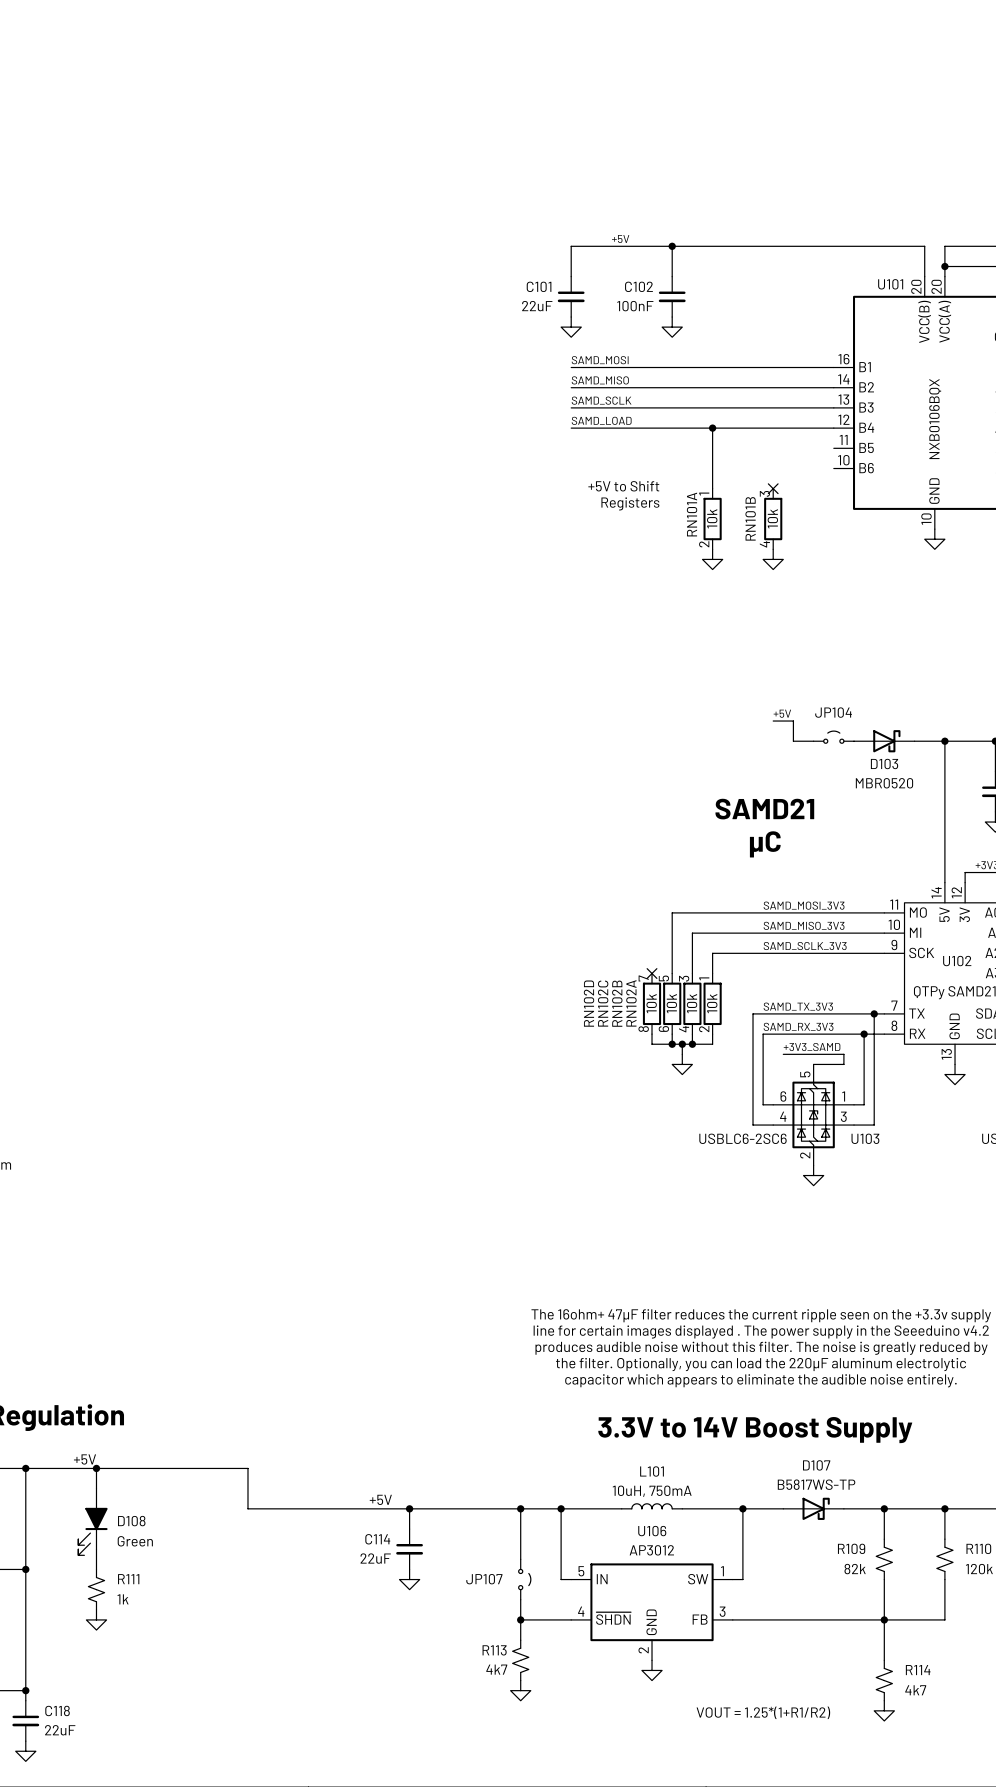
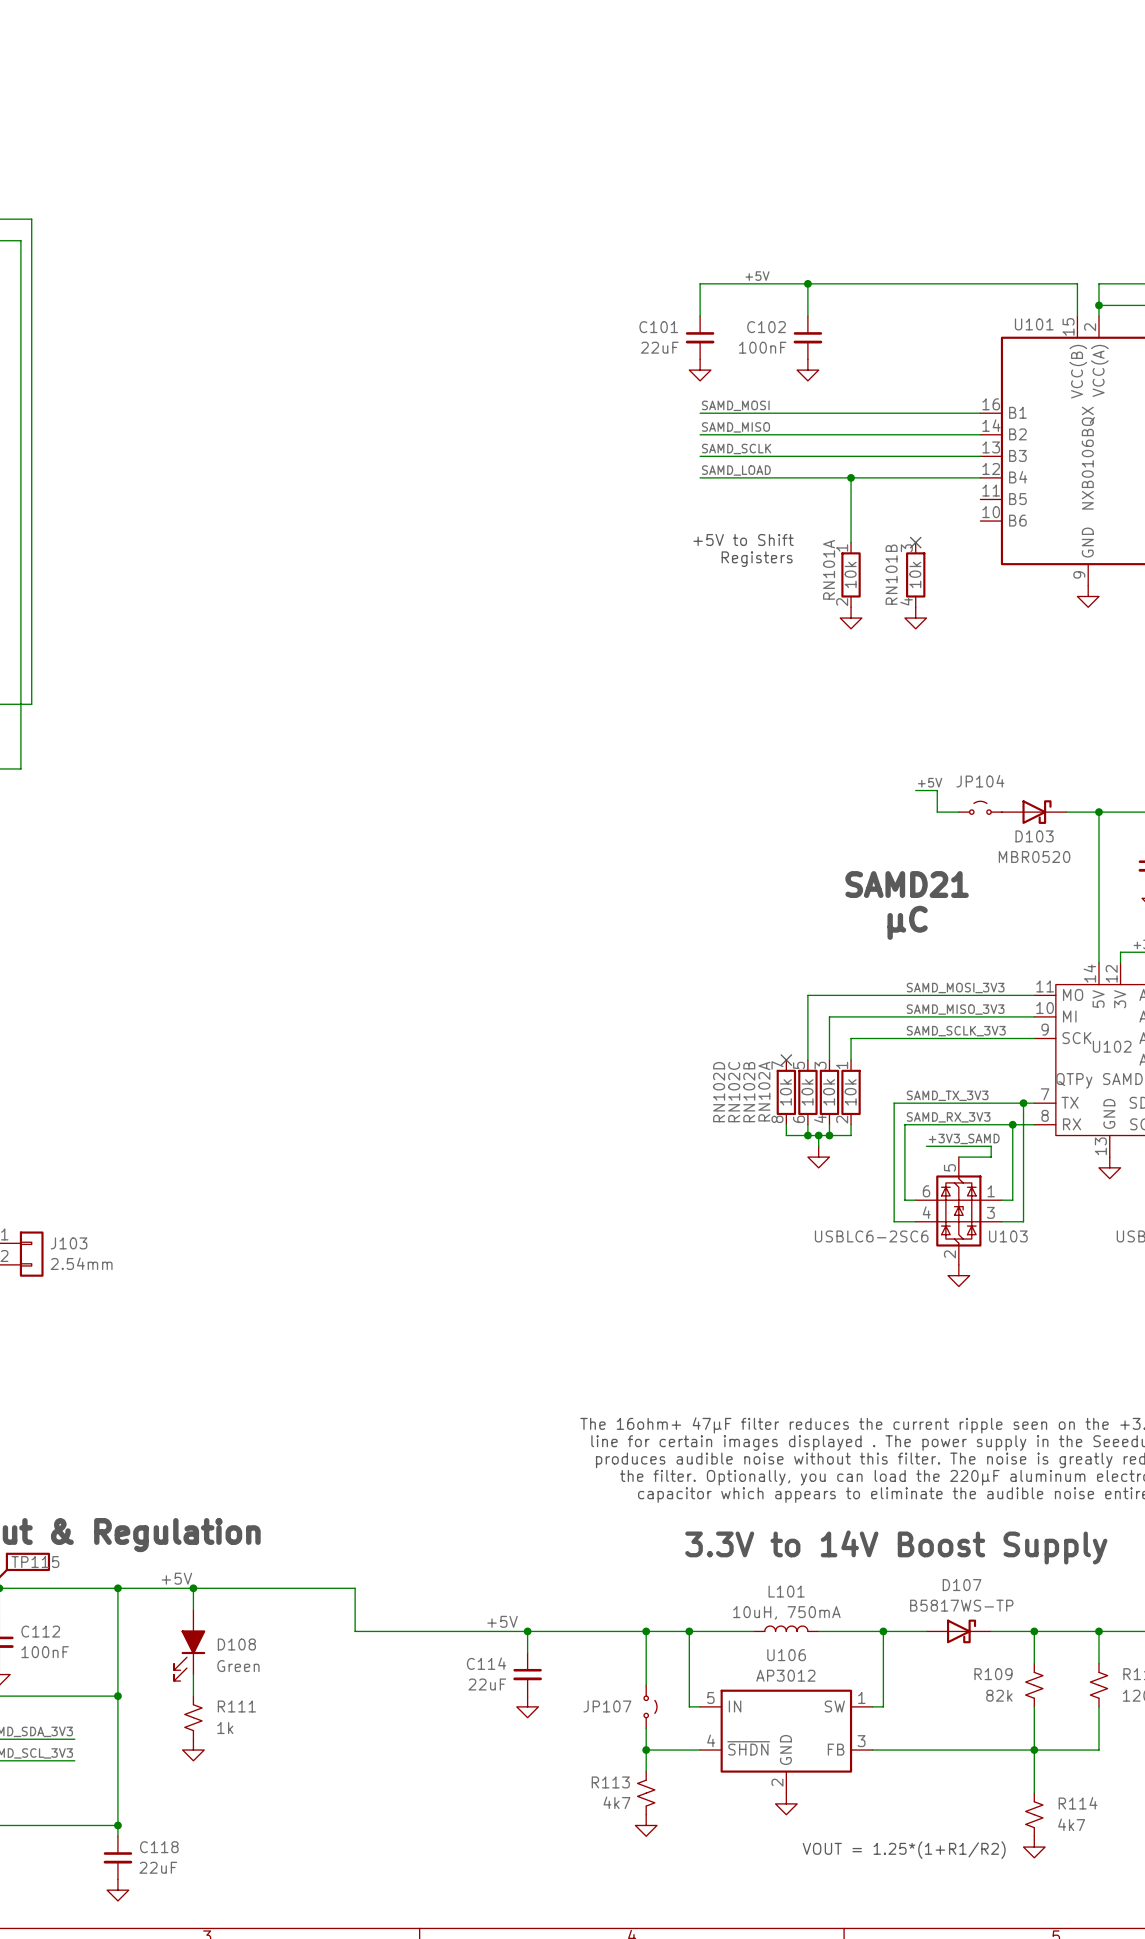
U101 pin number: 20 (916, 286) -> 15 (1068, 326)
U101 pin number: 20 (936, 286) -> 2 (1090, 327)
U101 pin number: 10 (926, 519) -> 9 (1079, 574)

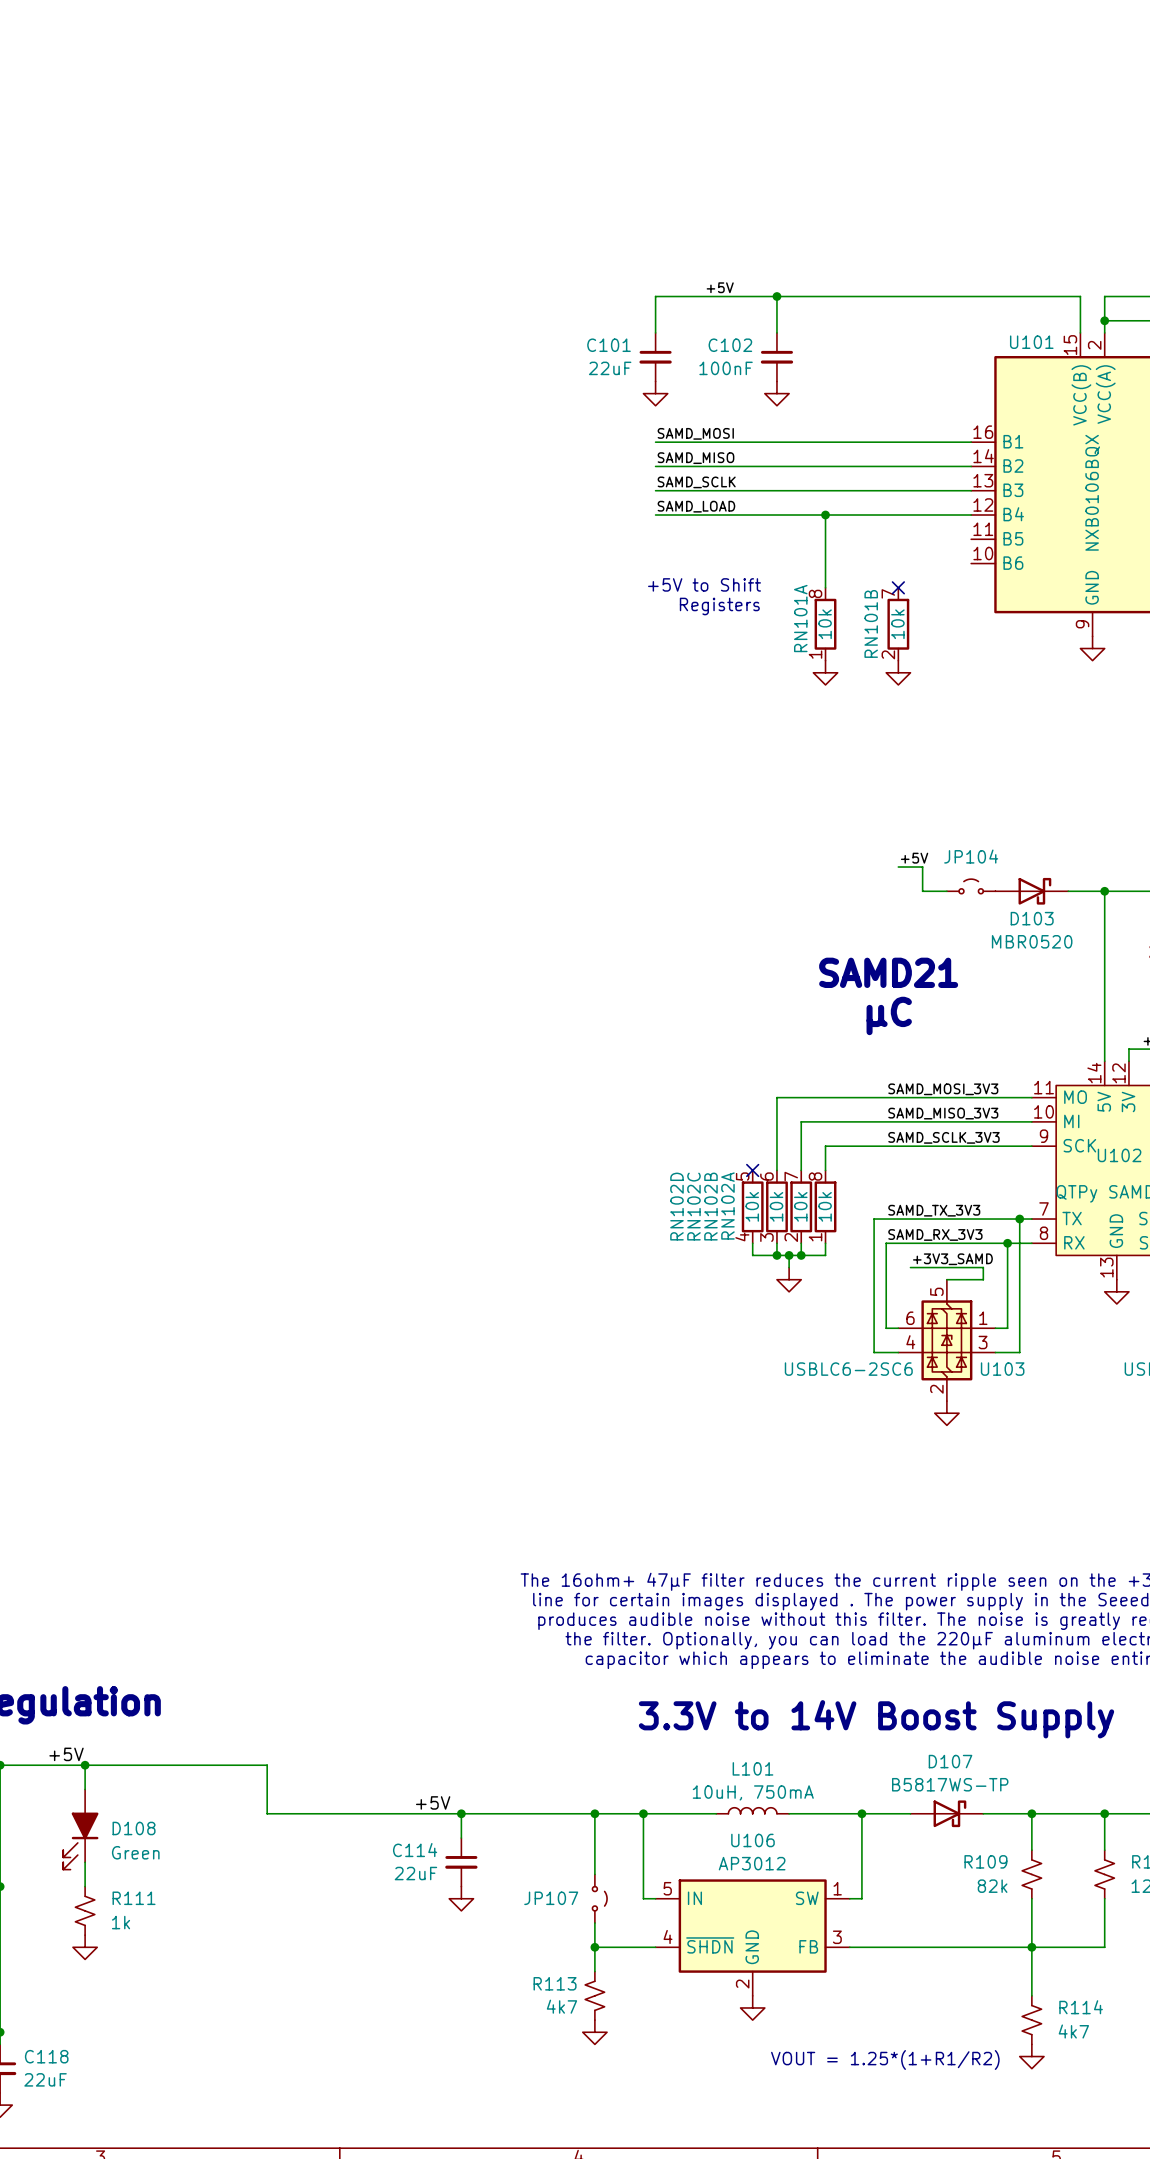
RN101A pin number: 1 (842, 547) -> 8 (815, 593)
RN101B pin number: 3 (906, 548) -> 7 (888, 593)
RN101B pin number: 4 (906, 601) -> 2 (888, 654)
RN101A pin number: 2 (842, 602) -> 1 (815, 654)
RN102D pin number: 7 (777, 1065) -> 5 (742, 1176)
RN102C pin number: 5 (799, 1065) -> 6 (766, 1176)
RN102B pin number: 3 (820, 1065) -> 7 (791, 1176)
RN102A pin number: 1 (842, 1065) -> 8 (815, 1176)
RN102D pin number: 8 (777, 1119) -> 4 (742, 1236)
RN102C pin number: 6 (799, 1119) -> 3 (766, 1237)
RN102B pin number: 4 (820, 1119) -> 2 (791, 1237)
RN102A pin number: 2 (842, 1119) -> 1 (815, 1237)

